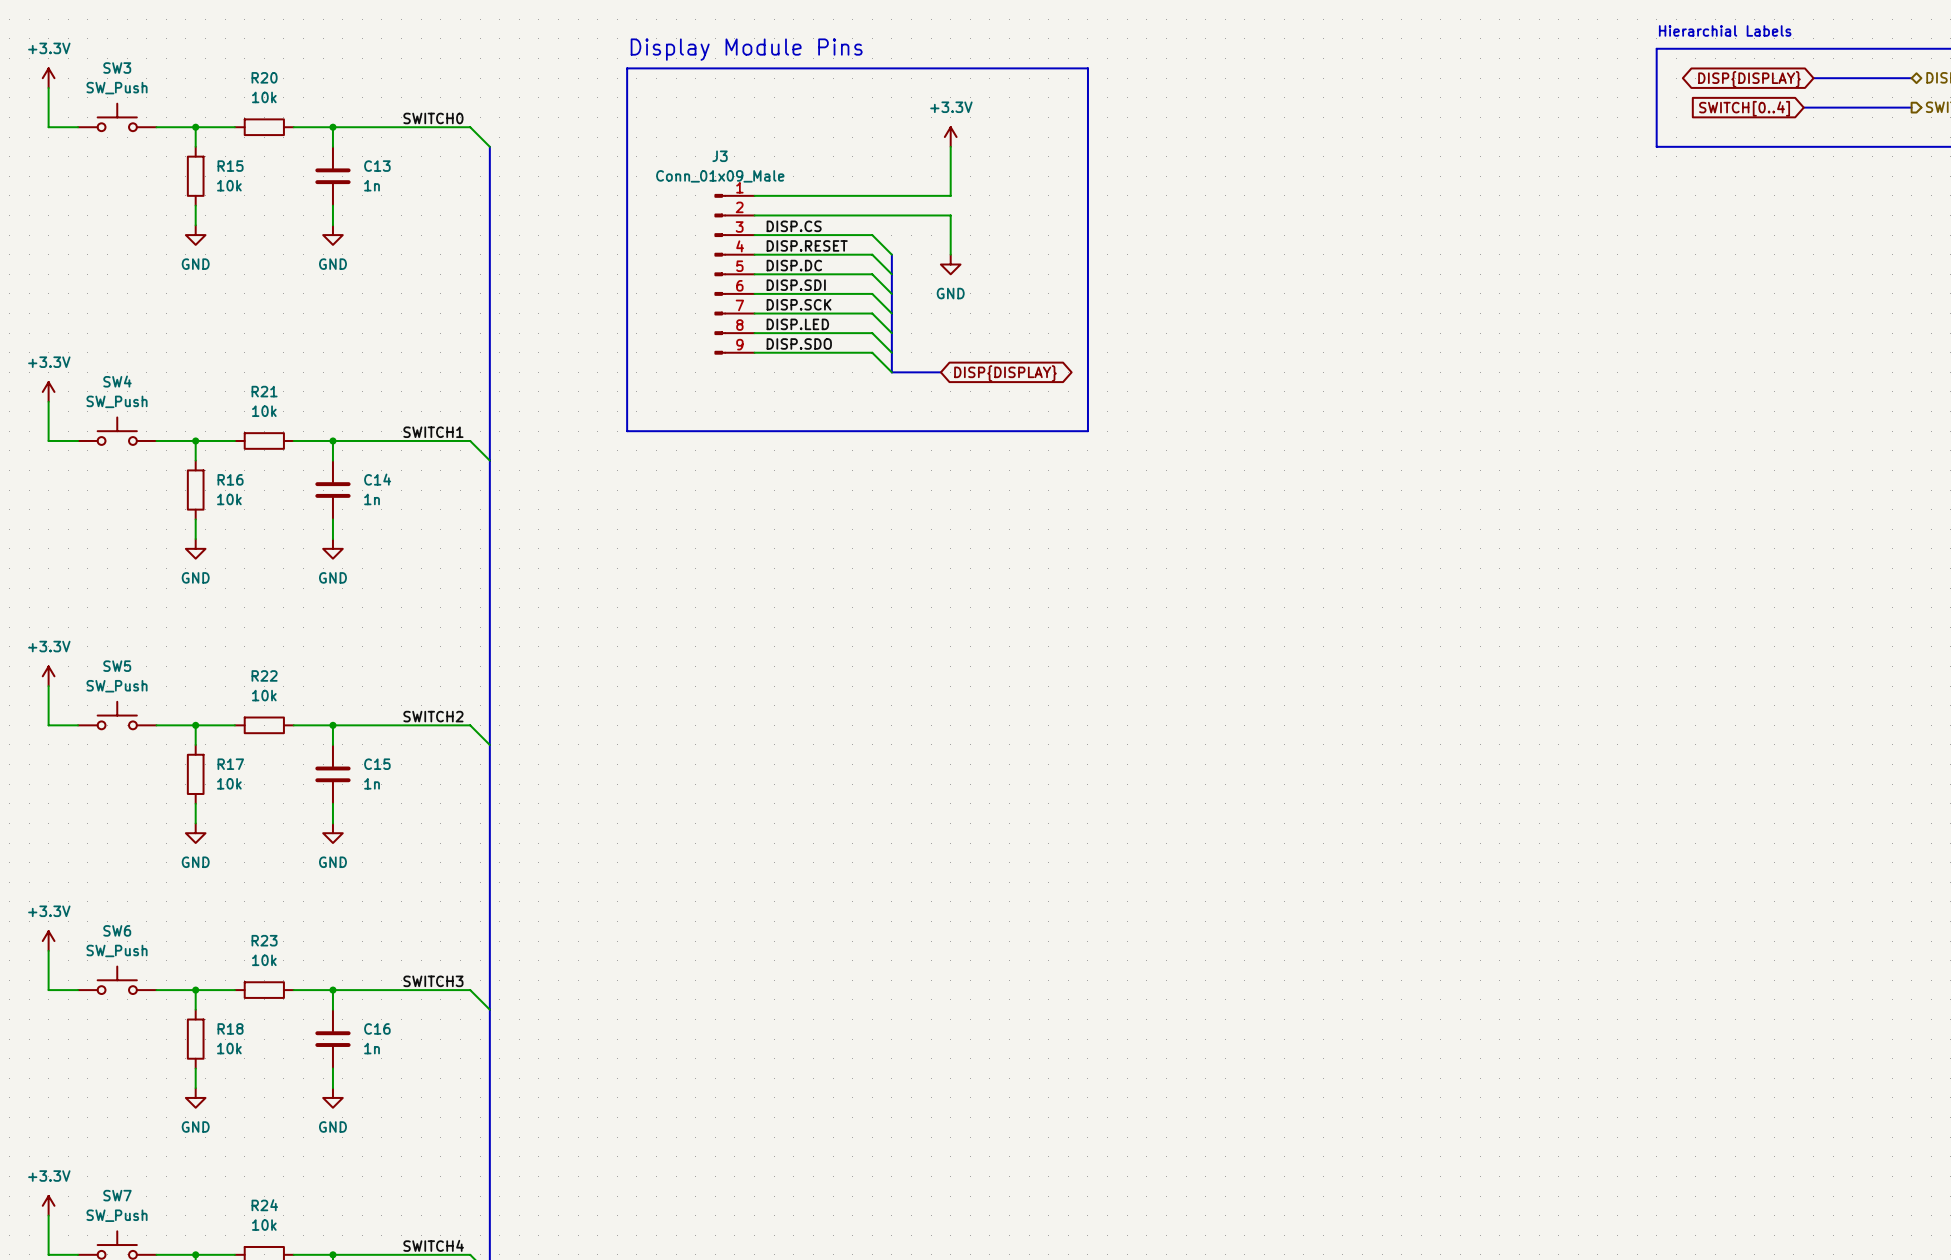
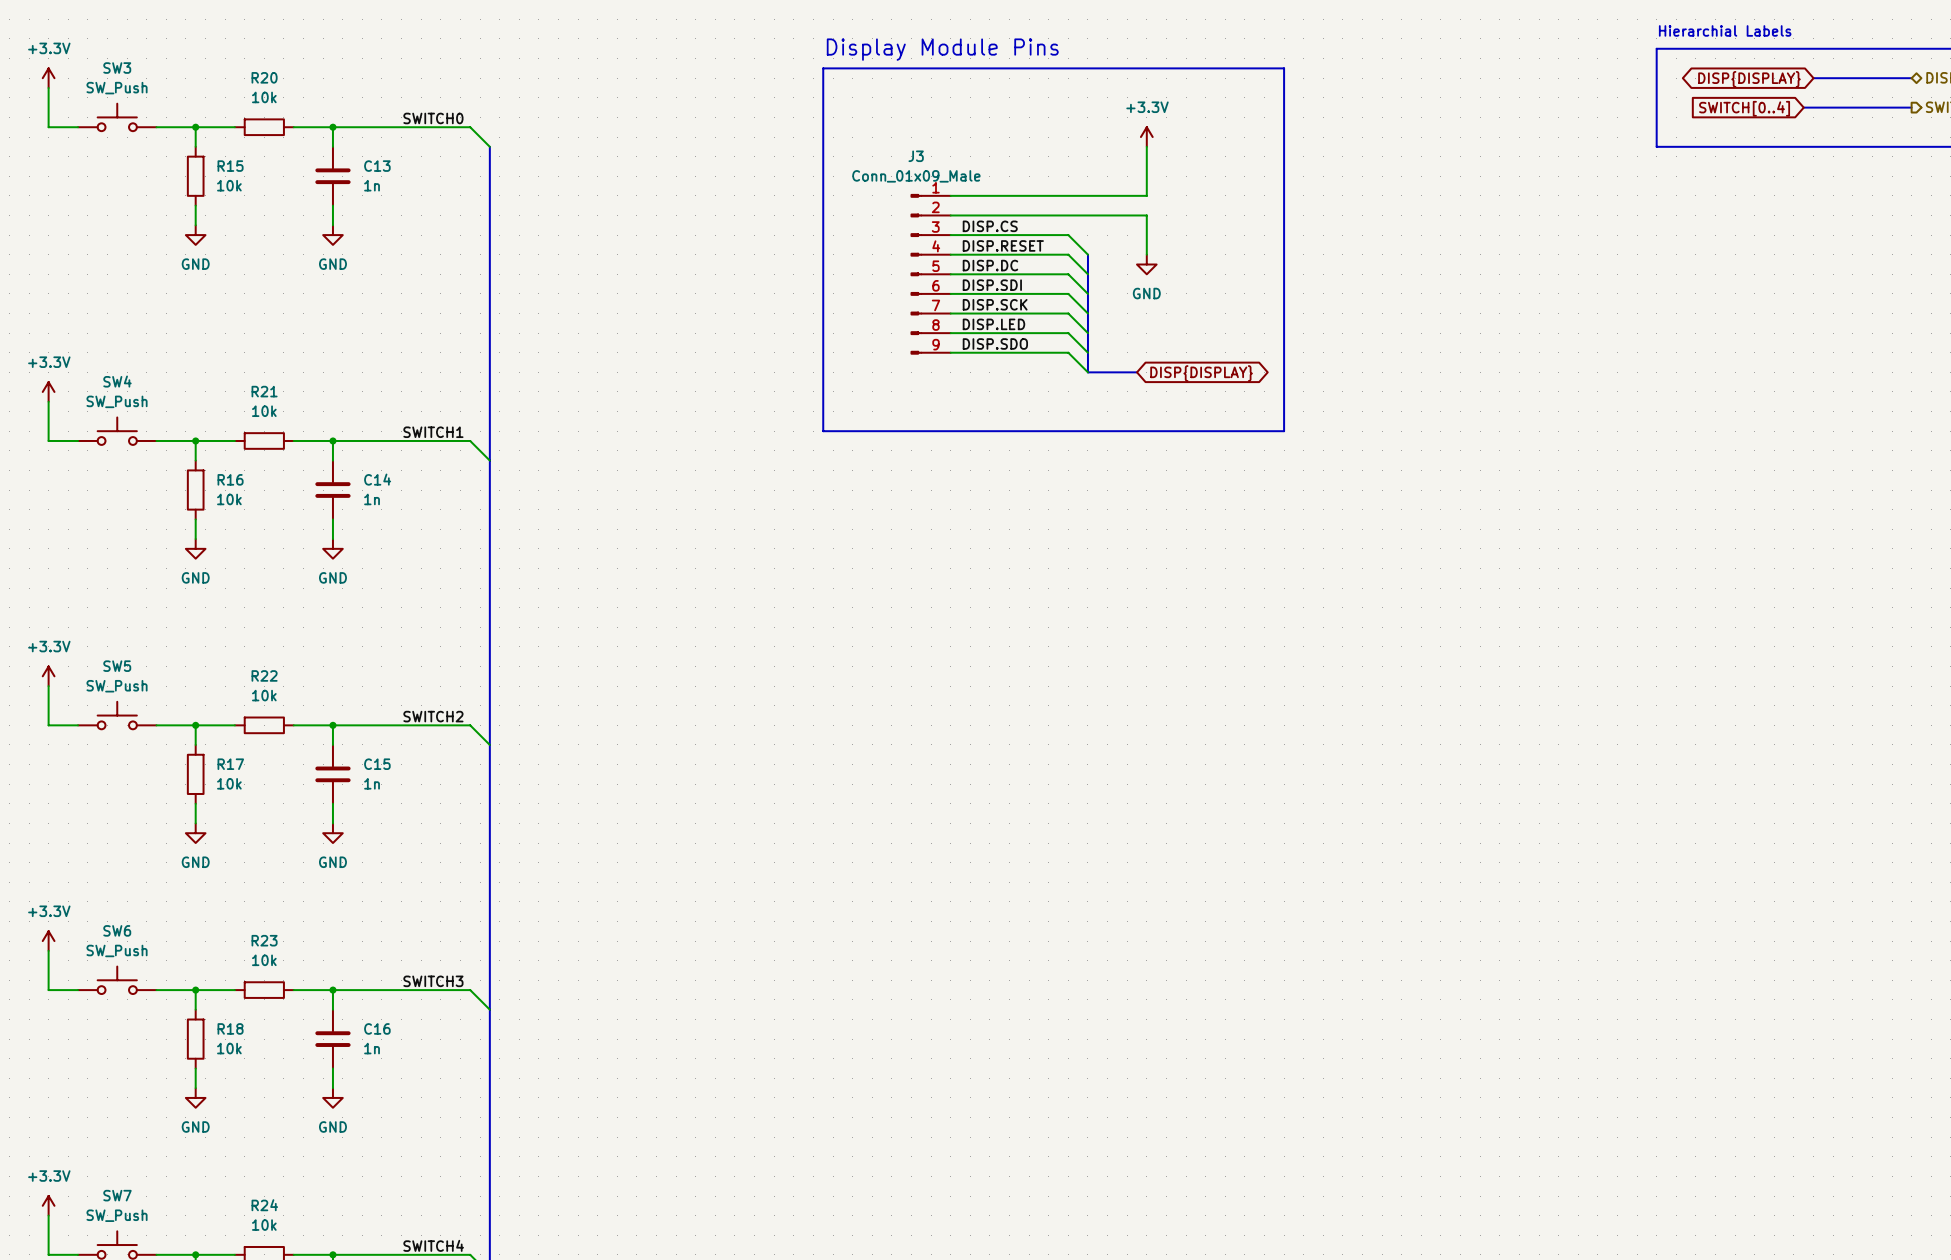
text: Display Module Pins (746, 49) -> none
text: none -> Display Module Pins (942, 49)
line: (823, 68) (627, 68) (627, 431) (823, 431) -> (823, 68) (823, 431)
line: (1087, 68) (1087, 431) -> (1087, 68) (1284, 68) (1284, 431) (1087, 431)
power symbol: +3.3V (950, 137) -> none
power symbol: none -> +3.3V (1146, 137)
wire: (950, 146) (950, 195) (754, 195) -> none
wire: none -> (1146, 146) (1146, 195) (950, 195)
wire: (754, 215) (950, 215) (950, 254) -> (1087, 274) (1068, 254) (950, 254)
wire: none -> (950, 215) (1146, 215) (1146, 254)
label: DISP.CS (794, 226) -> none
label: none -> DISP.CS (990, 226)
wire: (754, 235) (872, 235) (891, 254) -> none
wire: none -> (950, 235) (1068, 235) (1087, 254)
label: DISP.RESET (807, 245) -> none
label: none -> DISP.RESET (1003, 245)
wire: (754, 254) (872, 254) (891, 274) -> none
bus: (891, 254) (891, 372) (940, 372) -> none
bus: none -> (1087, 254) (1087, 372) (1137, 372)
power symbol: GND (950, 264) -> none
power symbol: none -> GND (1146, 264)
label: DISP.DC (794, 265) -> none
label: none -> DISP.DC (990, 265)
J3 position: (734, 274) -> (930, 274)
wire: (754, 274) (872, 274) (891, 293) -> none
wire: none -> (950, 274) (1068, 274) (1087, 293)
label: DISP.SDI (796, 285) -> none
label: none -> DISP.SDI (992, 285)
wire: (754, 293) (872, 293) (891, 313) -> none
wire: none -> (950, 293) (1068, 293) (1087, 313)
label: DISP.SCK (799, 304) -> none
label: none -> DISP.SCK (995, 304)
wire: (754, 313) (872, 313) (891, 333) -> none
wire: none -> (950, 313) (1068, 313) (1087, 333)
label: DISP.LED (797, 324) -> none
label: none -> DISP.LED (993, 324)
wire: (754, 333) (872, 333) (891, 352) -> none
wire: none -> (950, 333) (1068, 333) (1087, 352)
label: DISP.SDO (799, 343) -> none
label: none -> DISP.SDO (995, 343)
wire: (754, 352) (872, 352) (891, 372) -> none
wire: none -> (950, 352) (1068, 352) (1087, 372)
global label: DISP{DISPLAY} (1005, 373) -> none
global label: none -> DISP{DISPLAY} (1201, 373)

